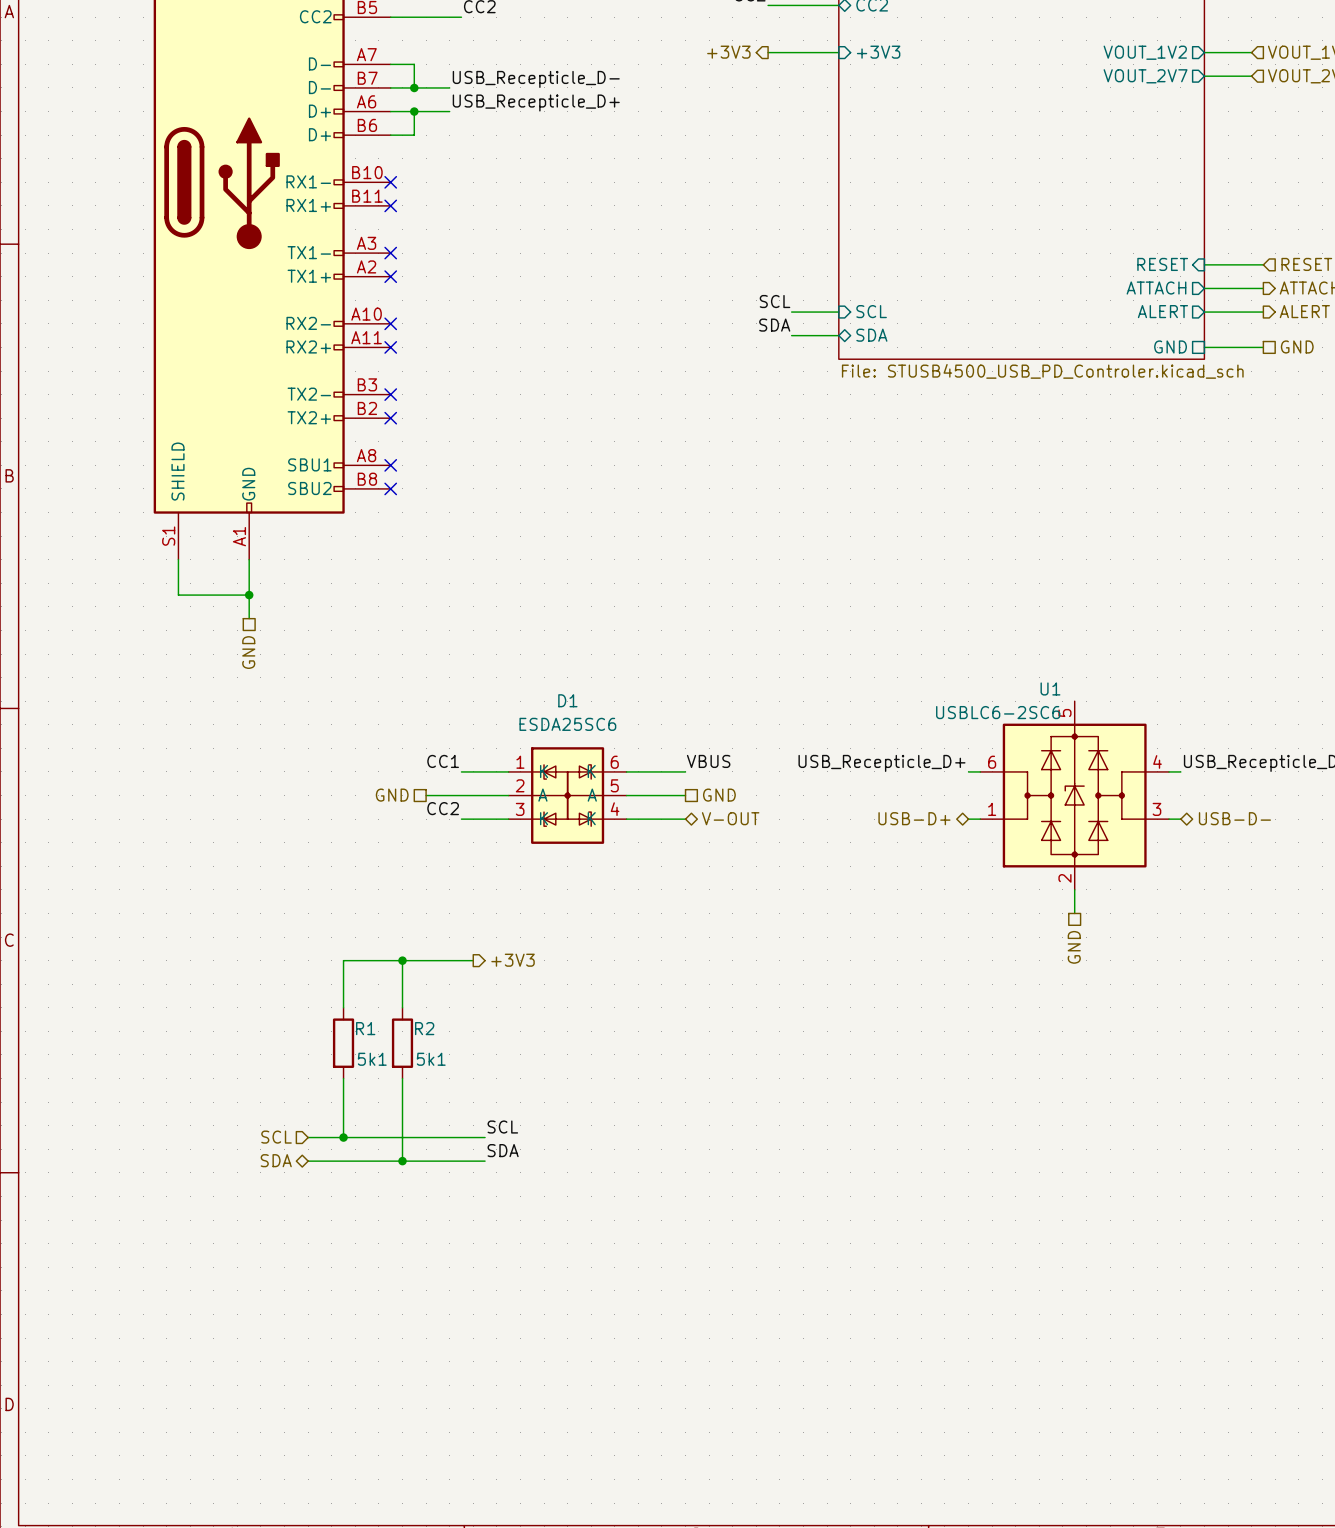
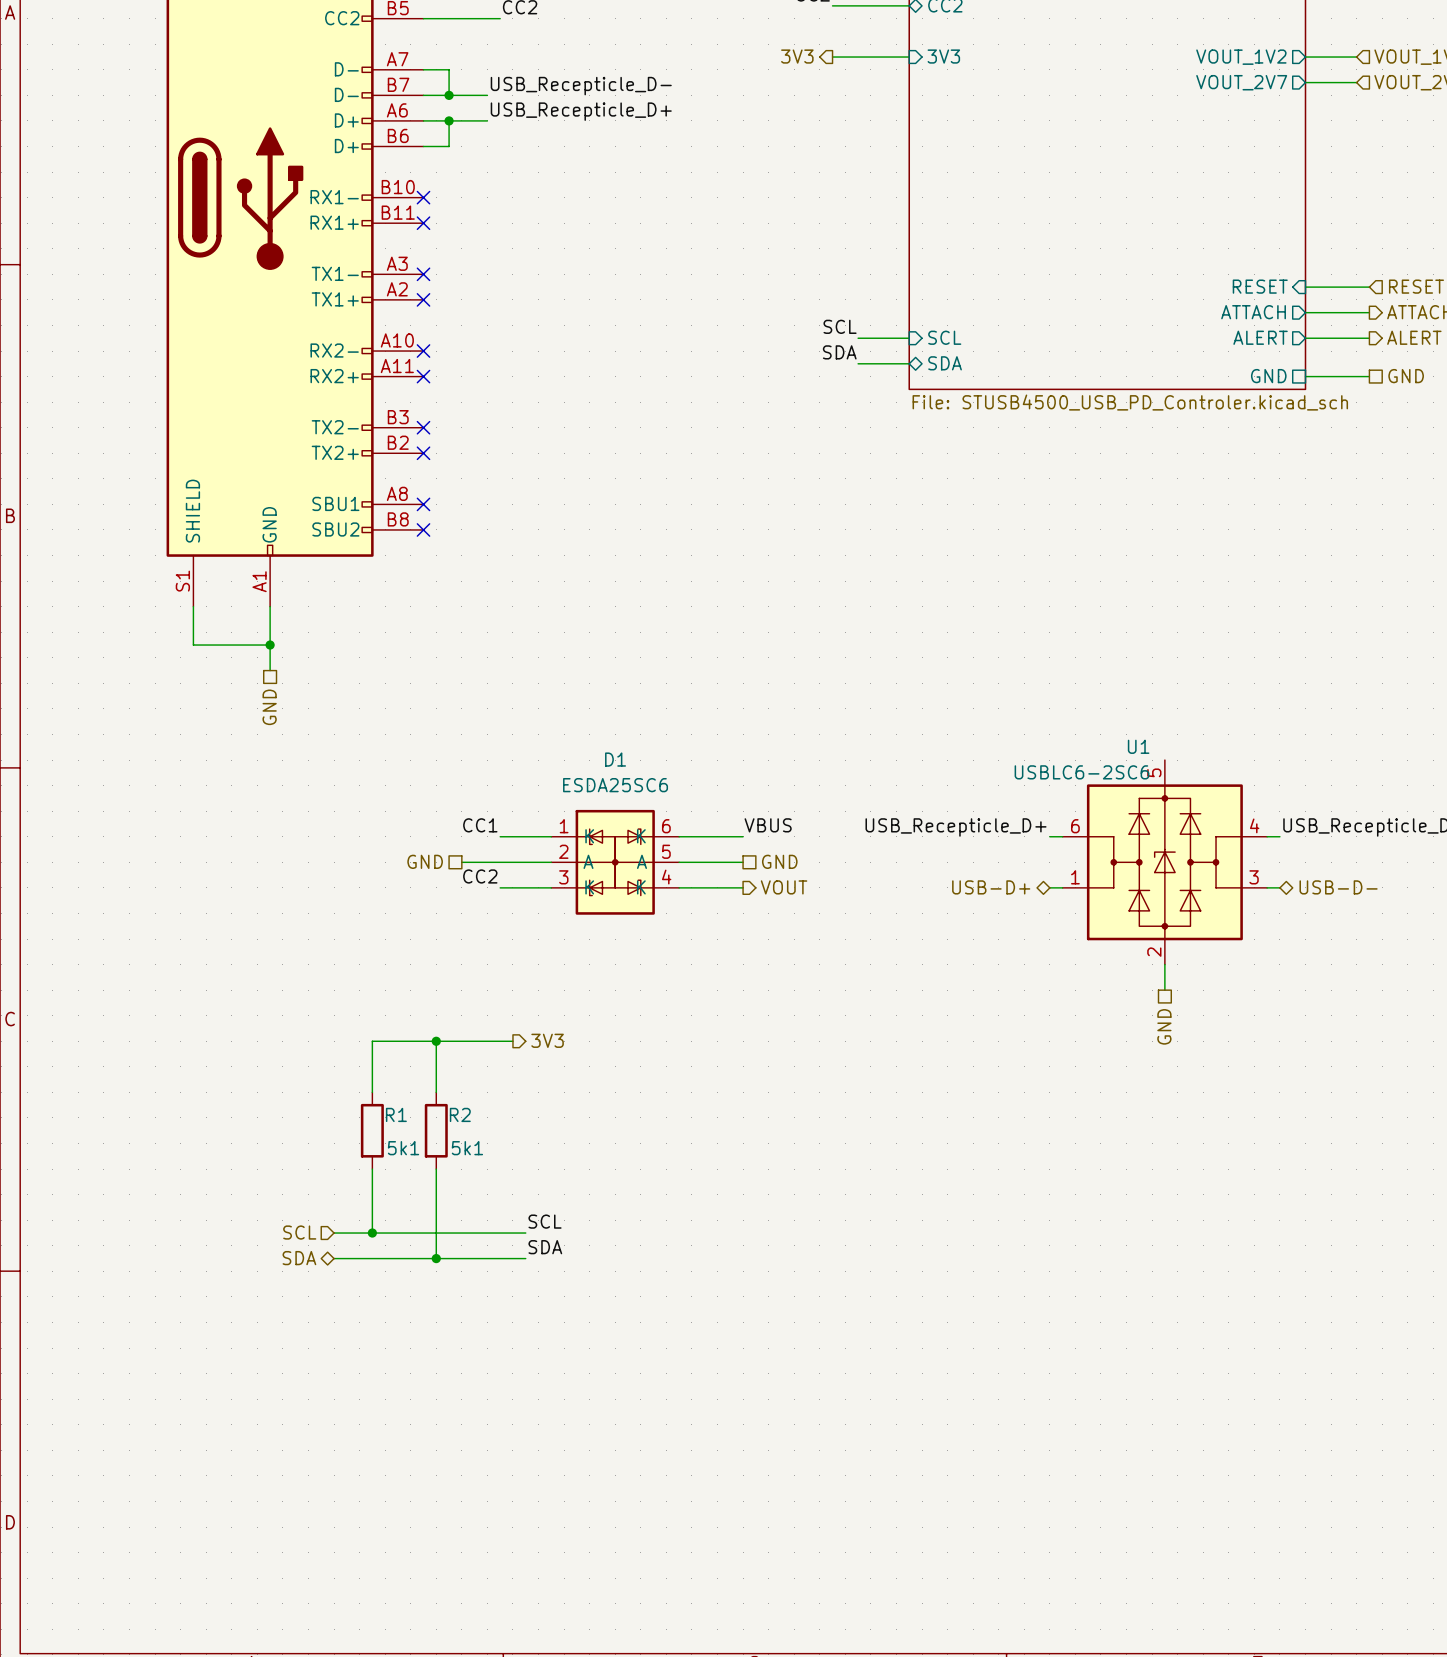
hierarchical label: +3V3 (728, 52) -> 3V3 (797, 56)
sheet pin: +3V3 (878, 52) -> 3V3 (943, 56)
hierarchical label shape: bidirectional (730, 818) -> output (784, 887)
hierarchical label: V-OUT (730, 818) -> VOUT (784, 887)
hierarchical label: +3V3 (513, 960) -> 3V3 (547, 1040)

